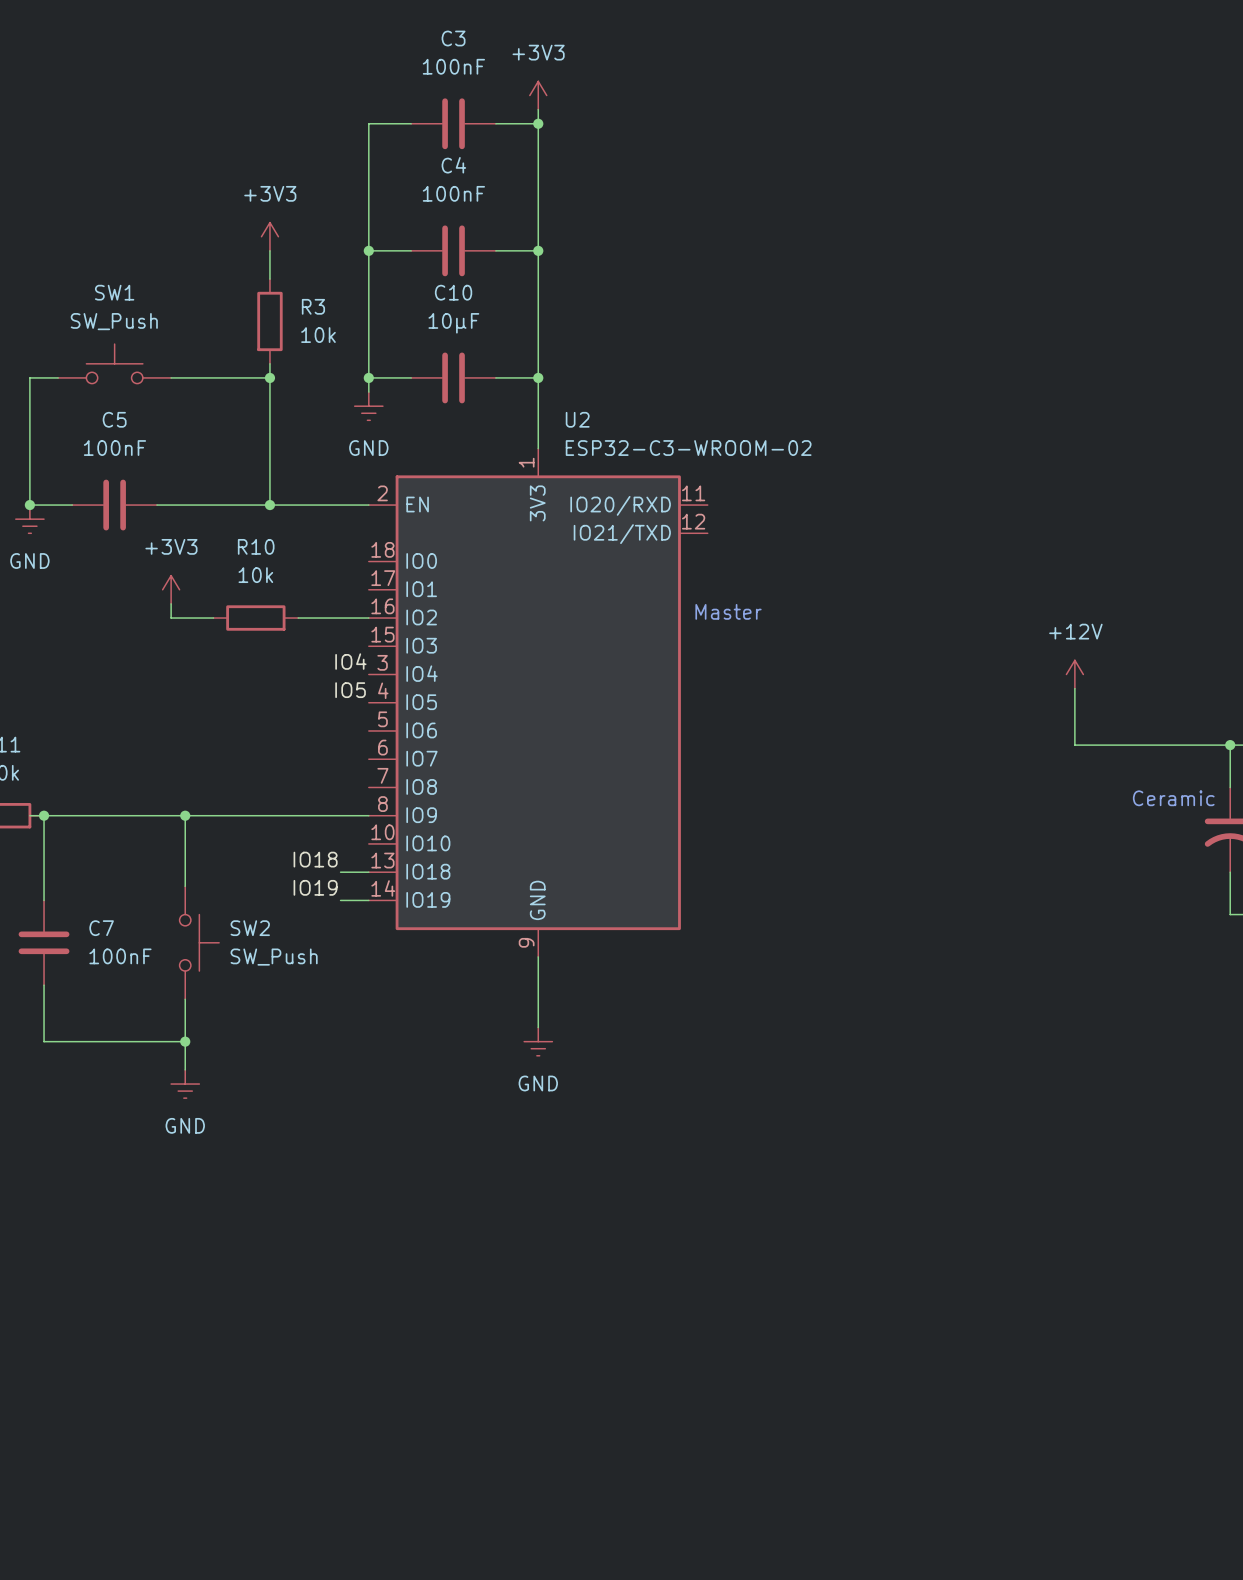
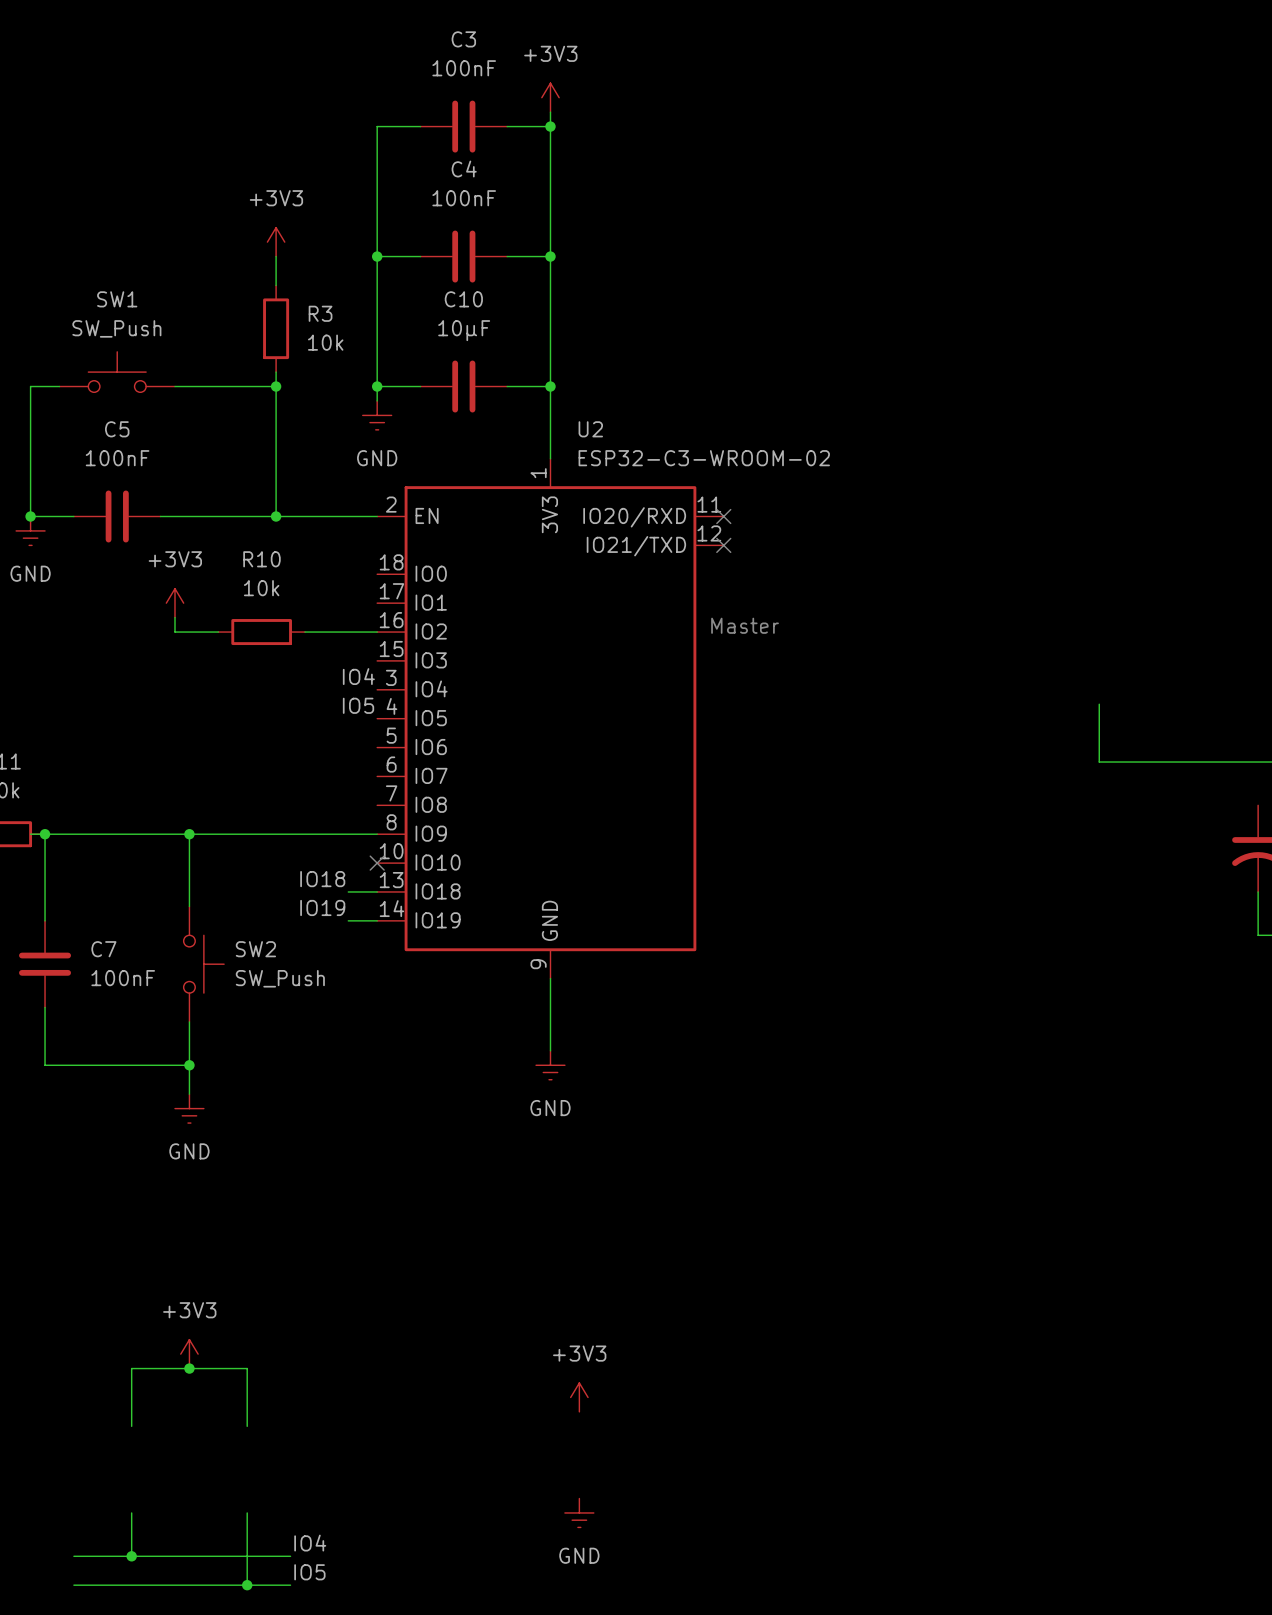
no-connect mark: none -> (723, 516)
no-connect mark: none -> (723, 545)
power symbol: +12V (1074, 674) -> none
wire: (1230, 745) (1230, 787) -> none
junction: (1230, 745) -> none
text: Ceramic (1173, 798) -> none
no-connect mark: none -> (377, 863)
power symbol: none -> +3V3 (189, 1354)
junction: none -> (189, 1368)
power symbol: none -> +3V3 (579, 1397)
wire: none -> (131, 1426) (131, 1368) (247, 1368) (247, 1426)
wire: none -> (131, 1512) (131, 1556)
wire: none -> (247, 1512) (247, 1585)
power symbol: none -> GND (579, 1512)
label: none -> IO4 (310, 1543)
wire: none -> (73, 1556) (290, 1556)
junction: none -> (131, 1556)
label: none -> IO5 (309, 1572)
wire: none -> (73, 1585) (290, 1585)
junction: none -> (247, 1585)

